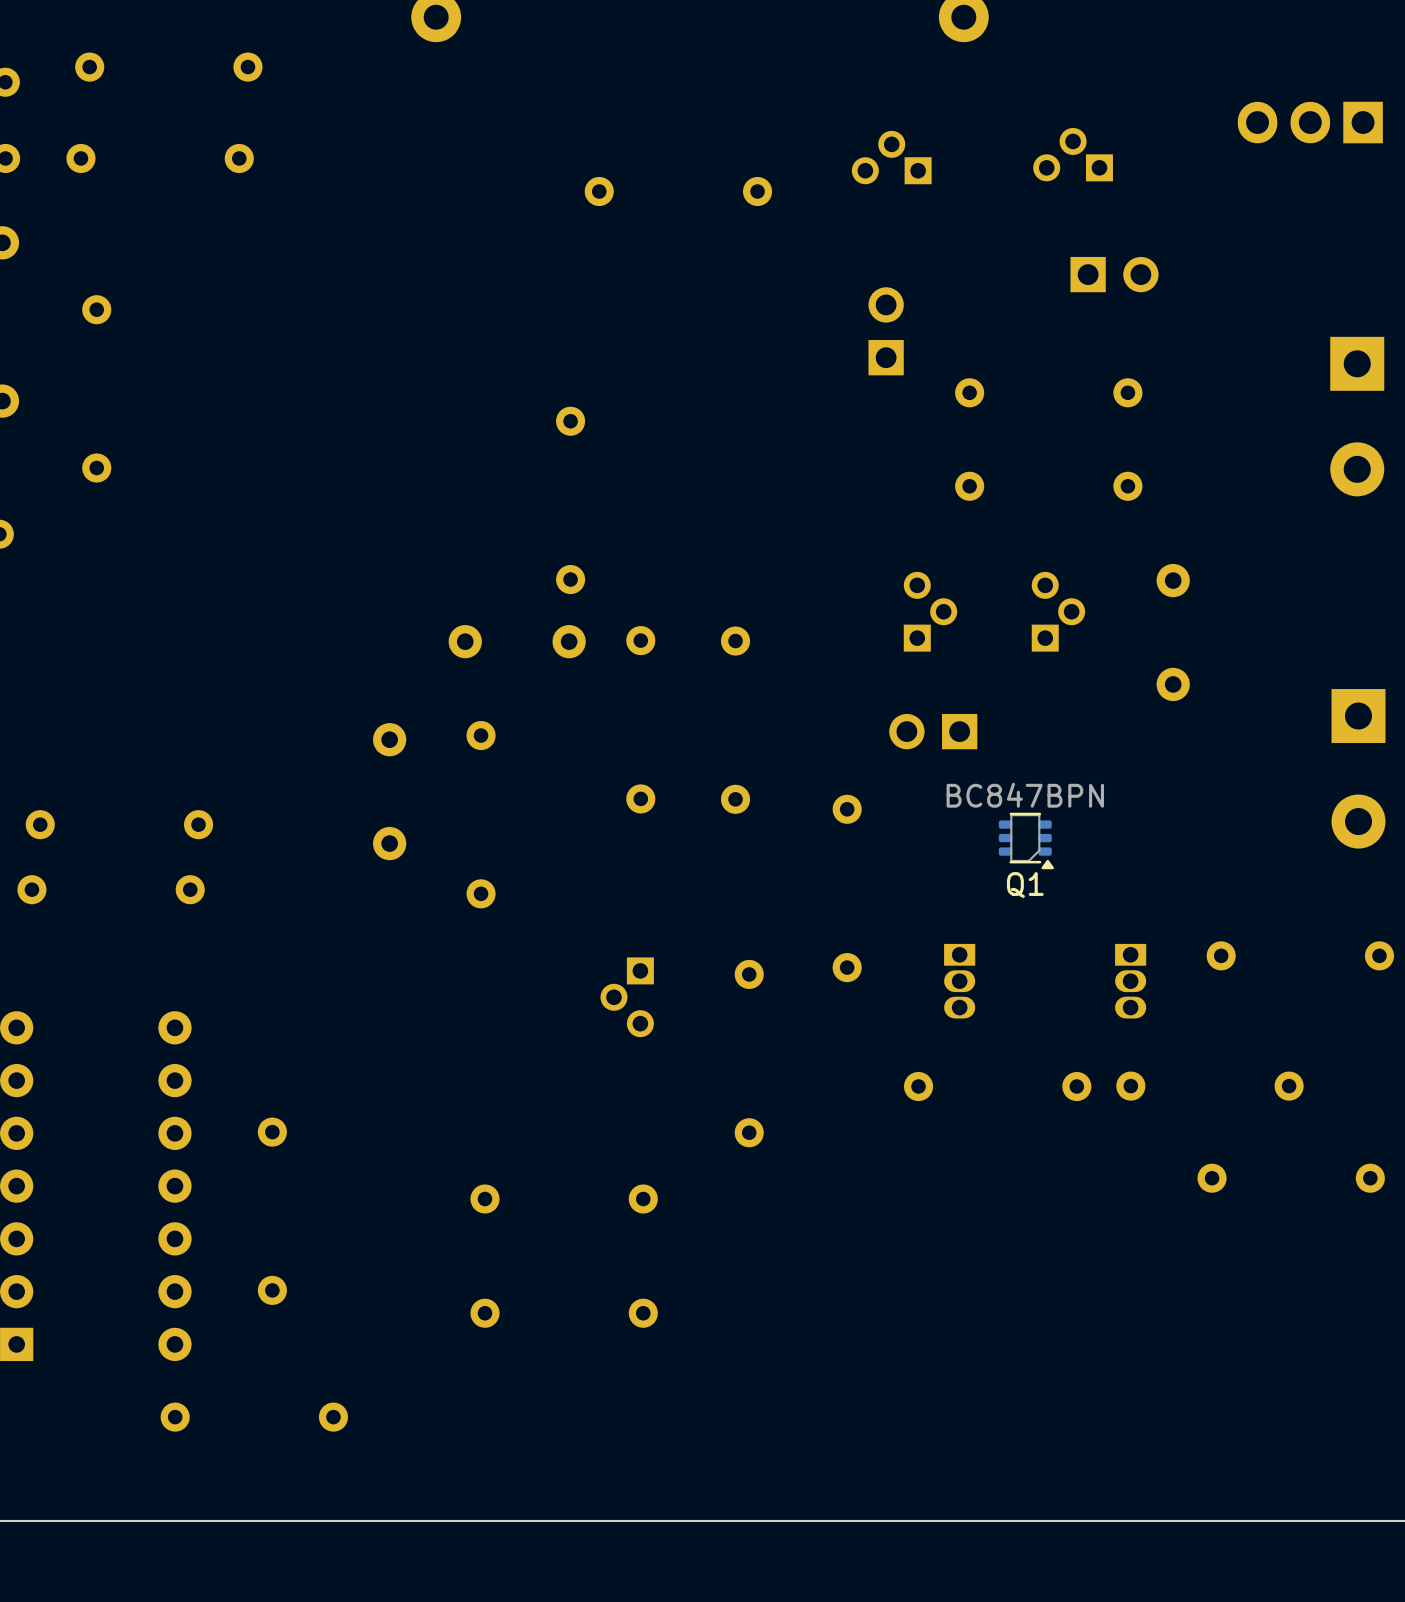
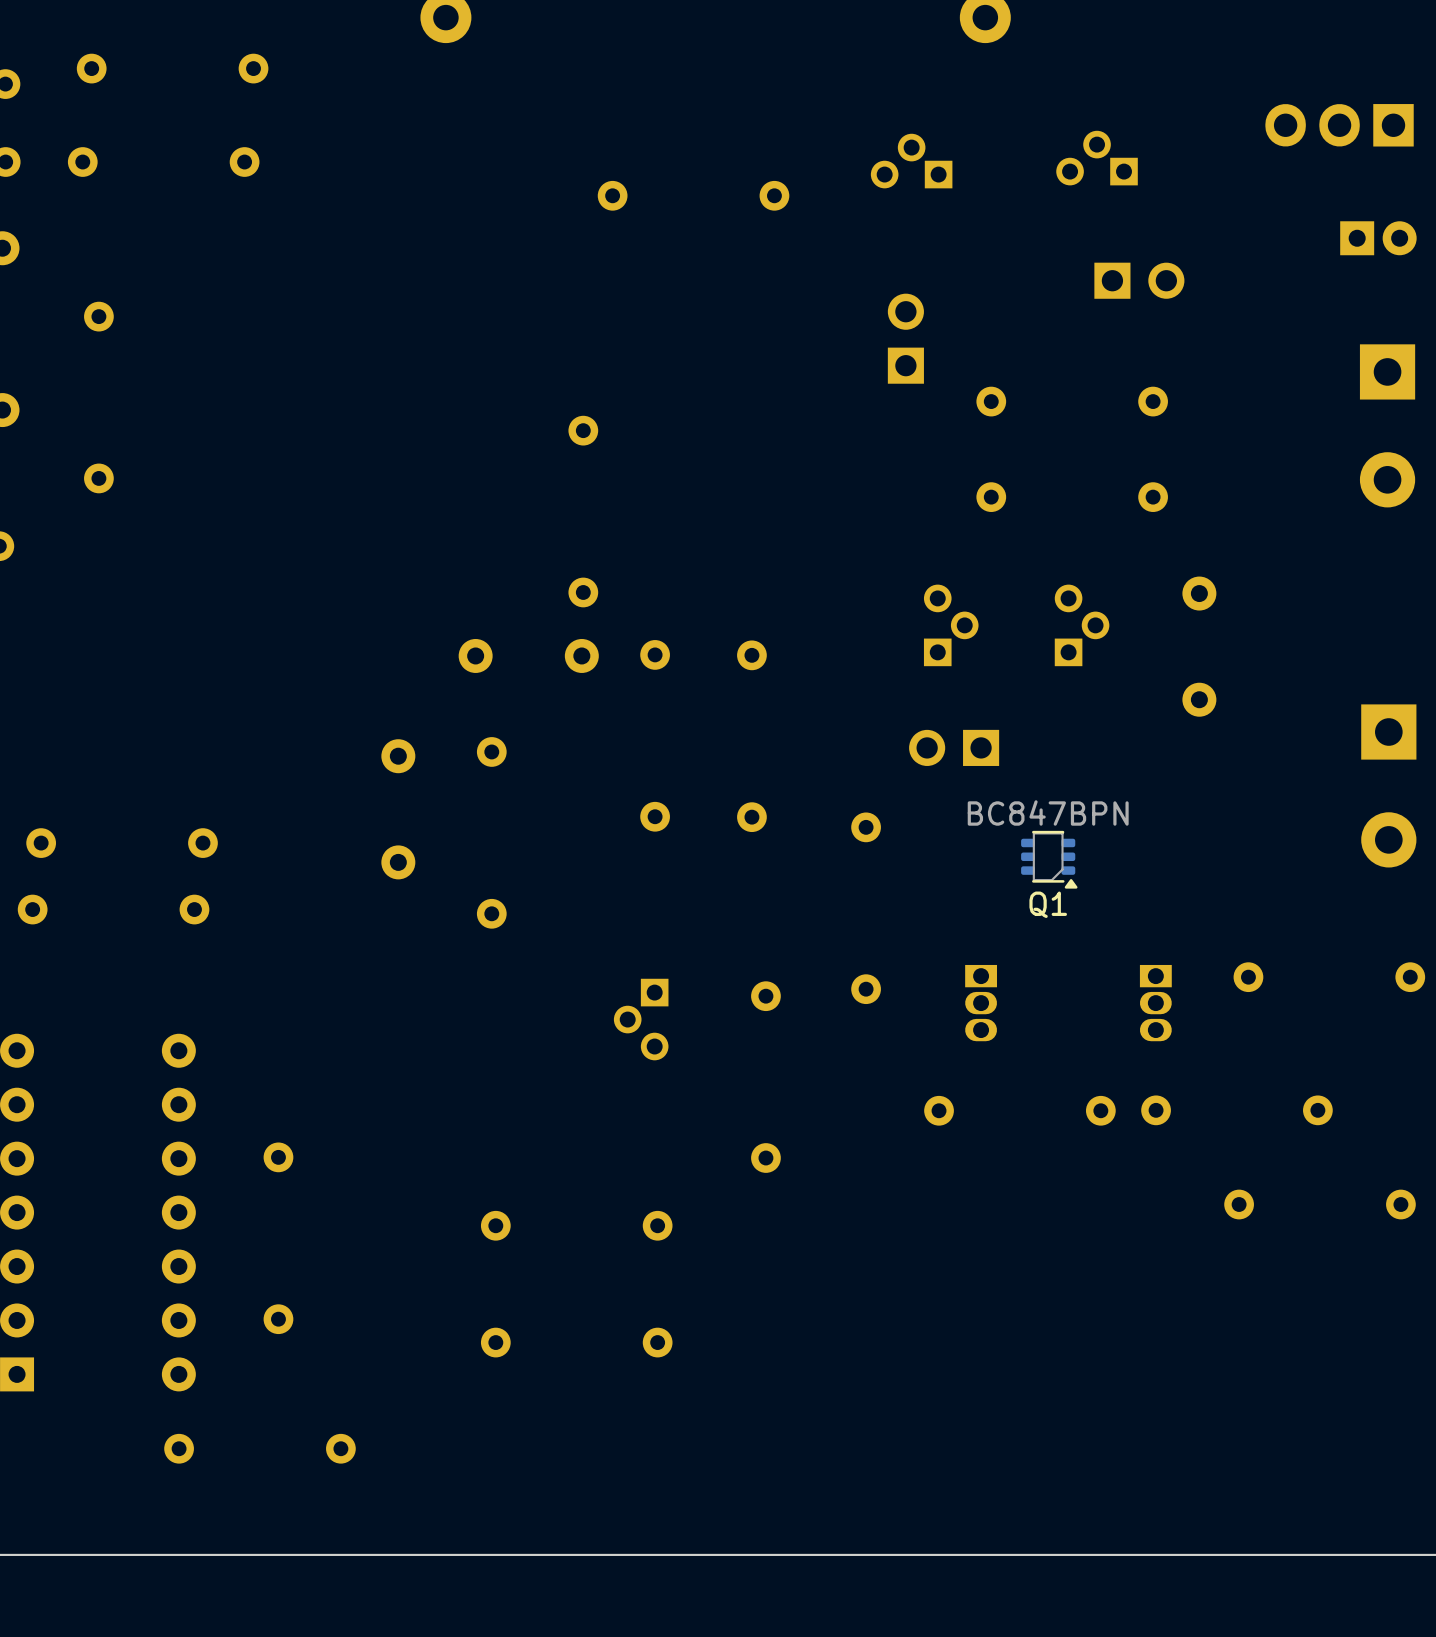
part: none -> (1378, 238)

